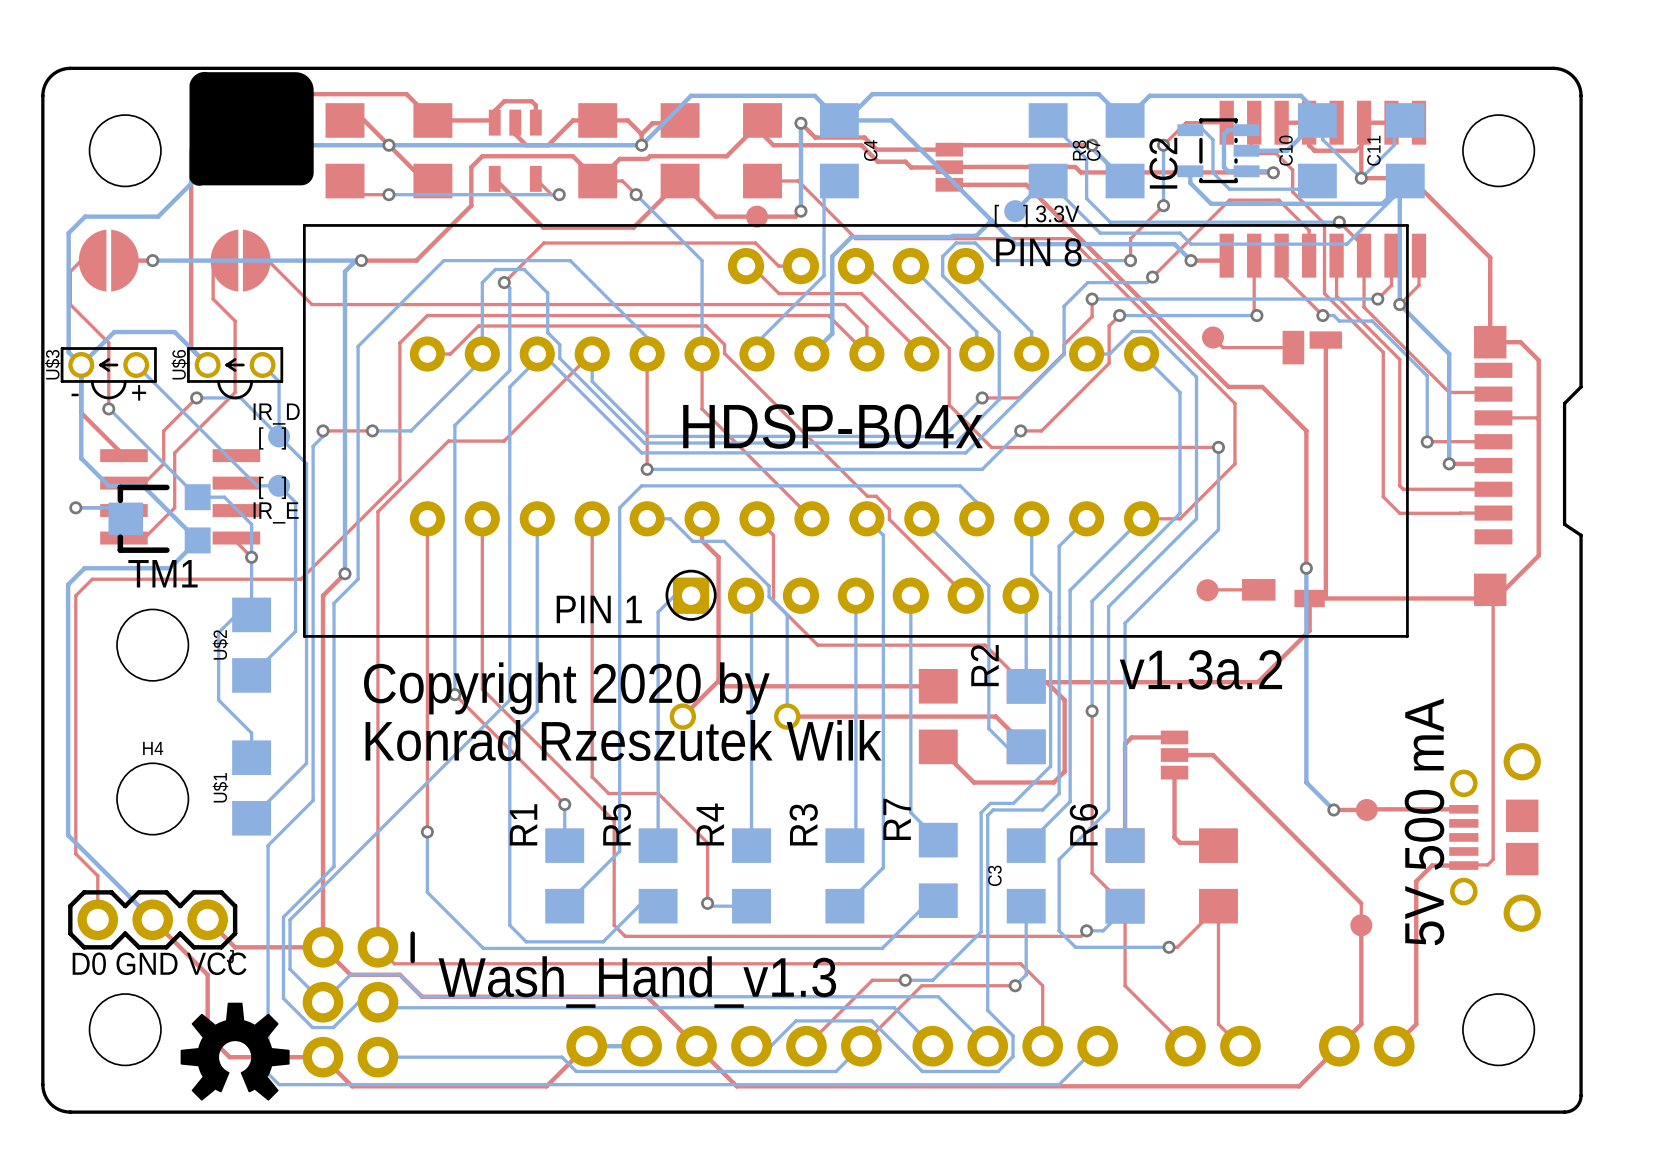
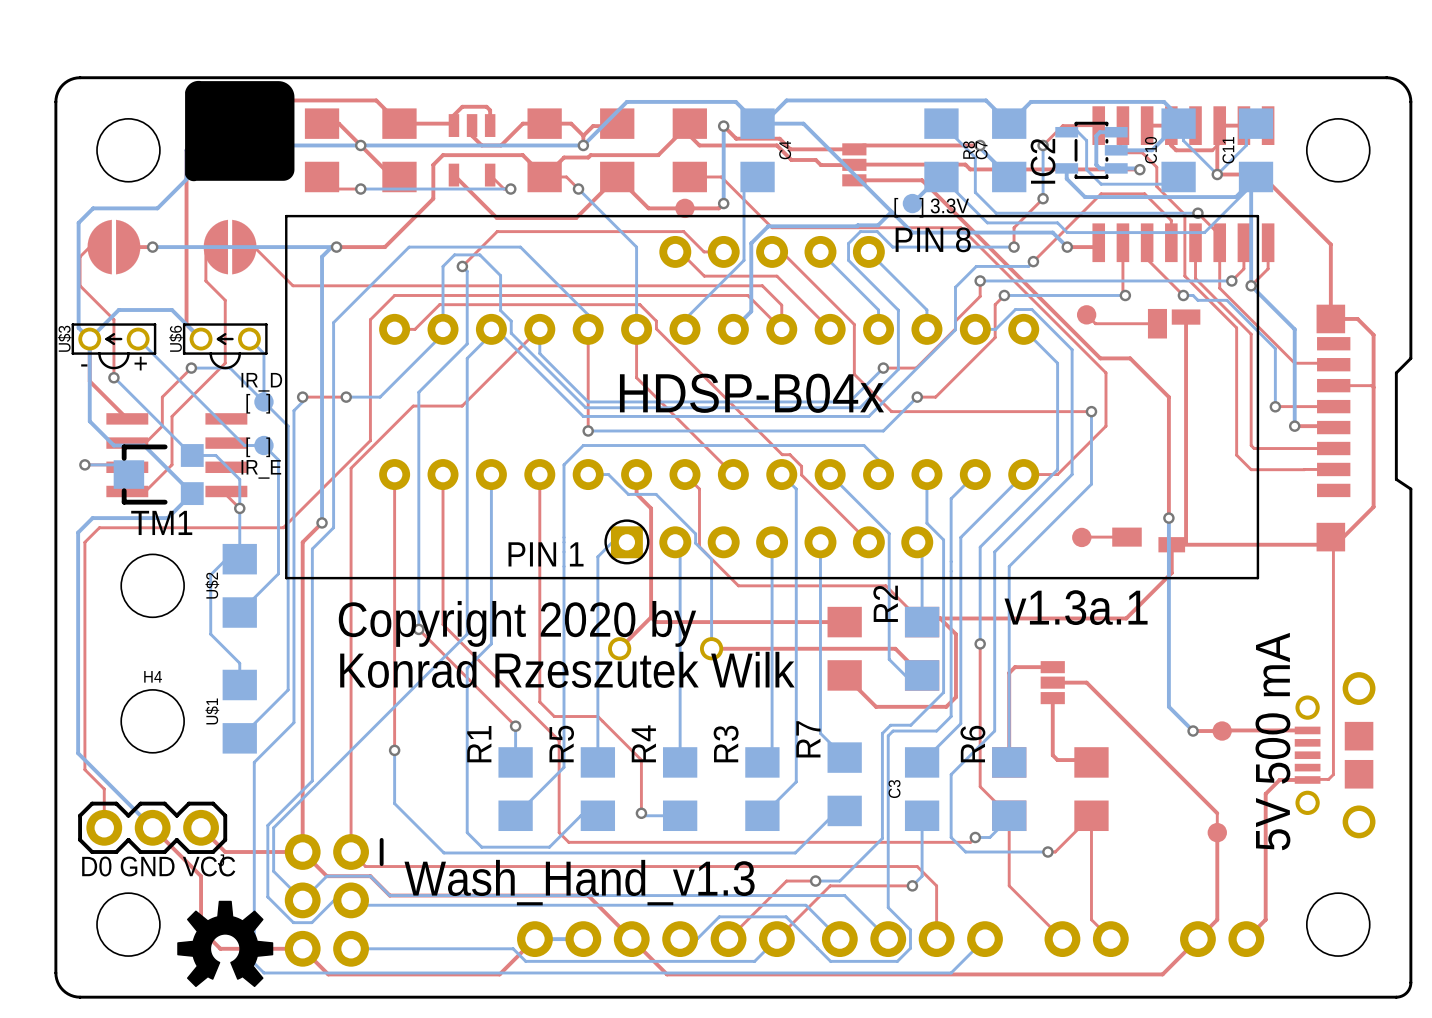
text: v1.3a.2 (1200, 669) -> v1.3a.1 (1076, 607)

